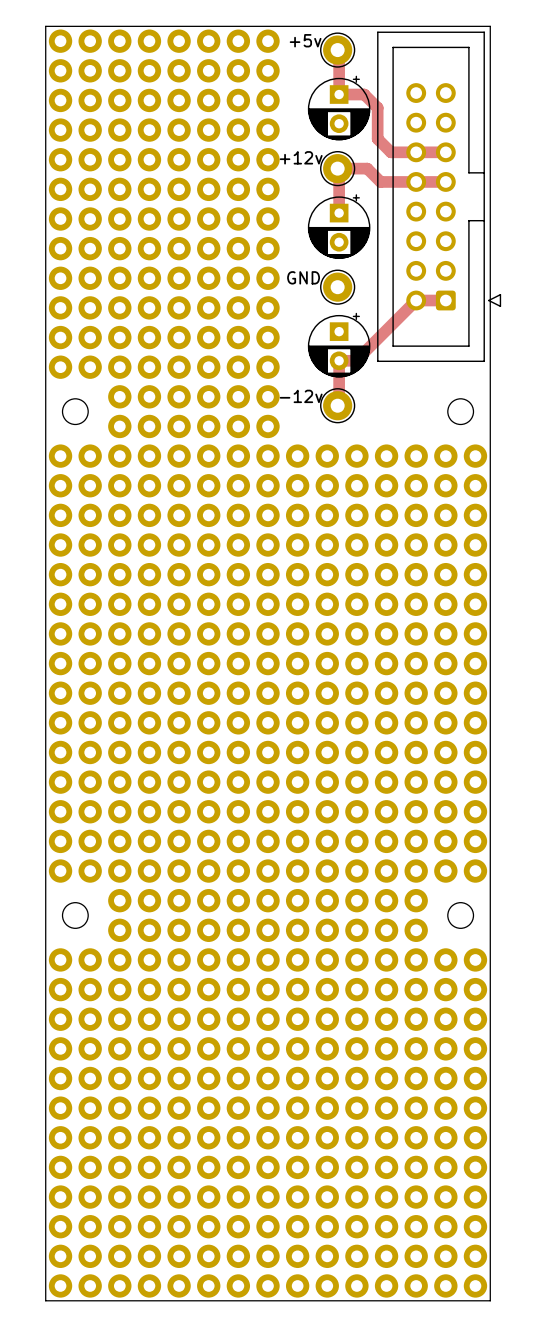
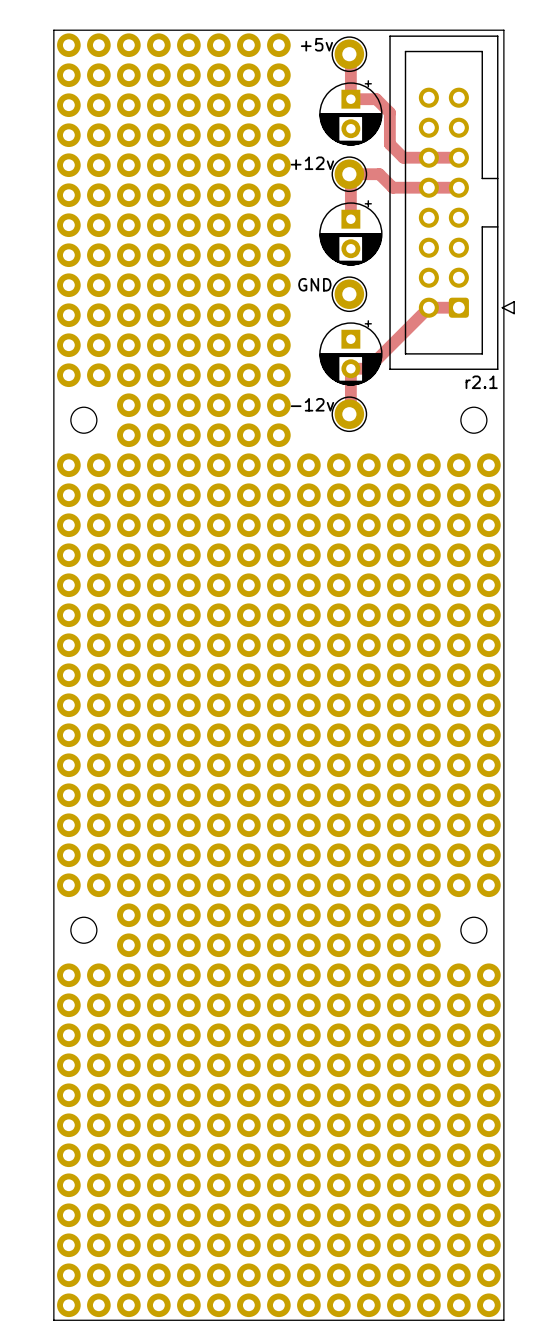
text: none -> r2.1 (481, 382)

